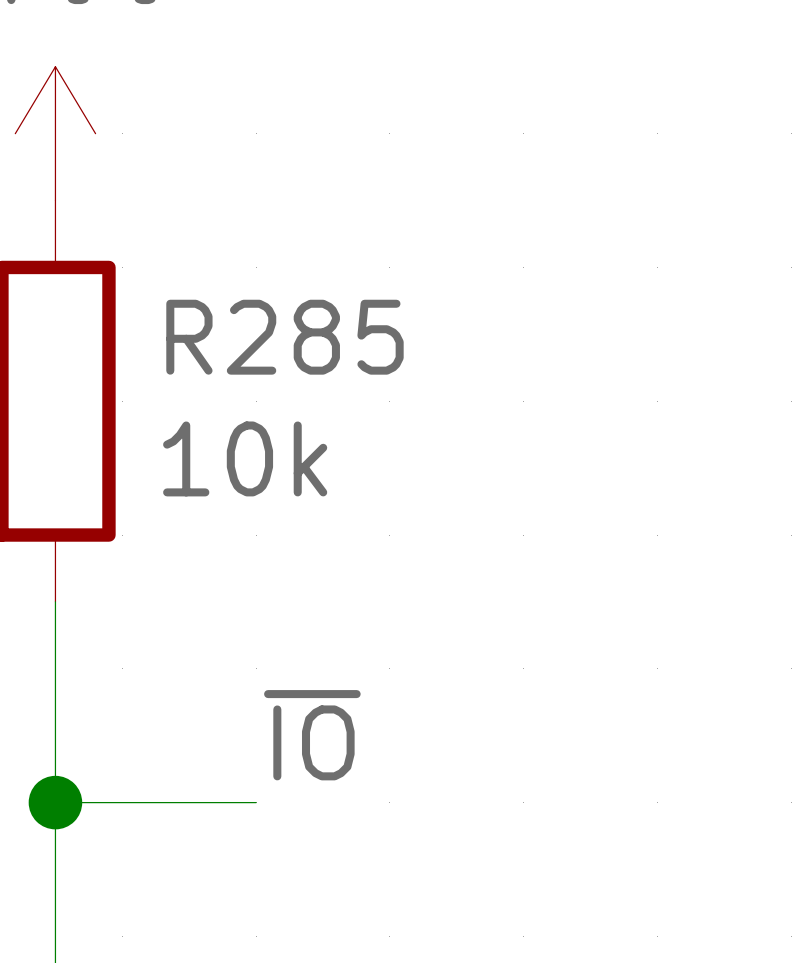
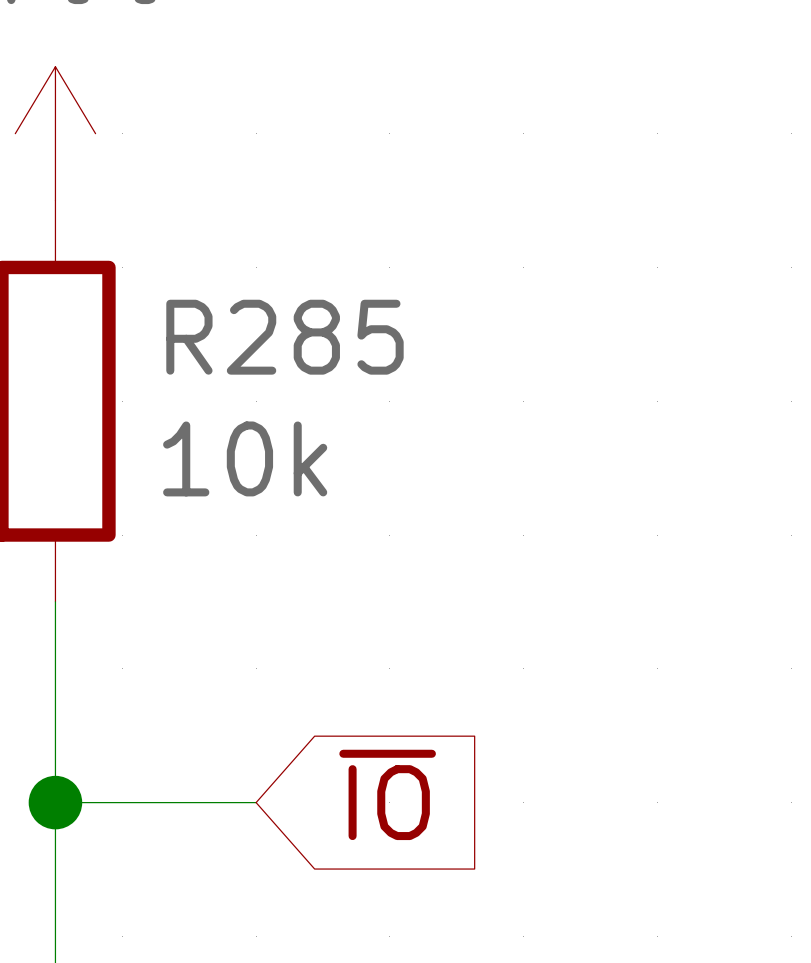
label: ~{IO} (312, 735) -> none
global label: none -> ~{IO} (387, 794)

